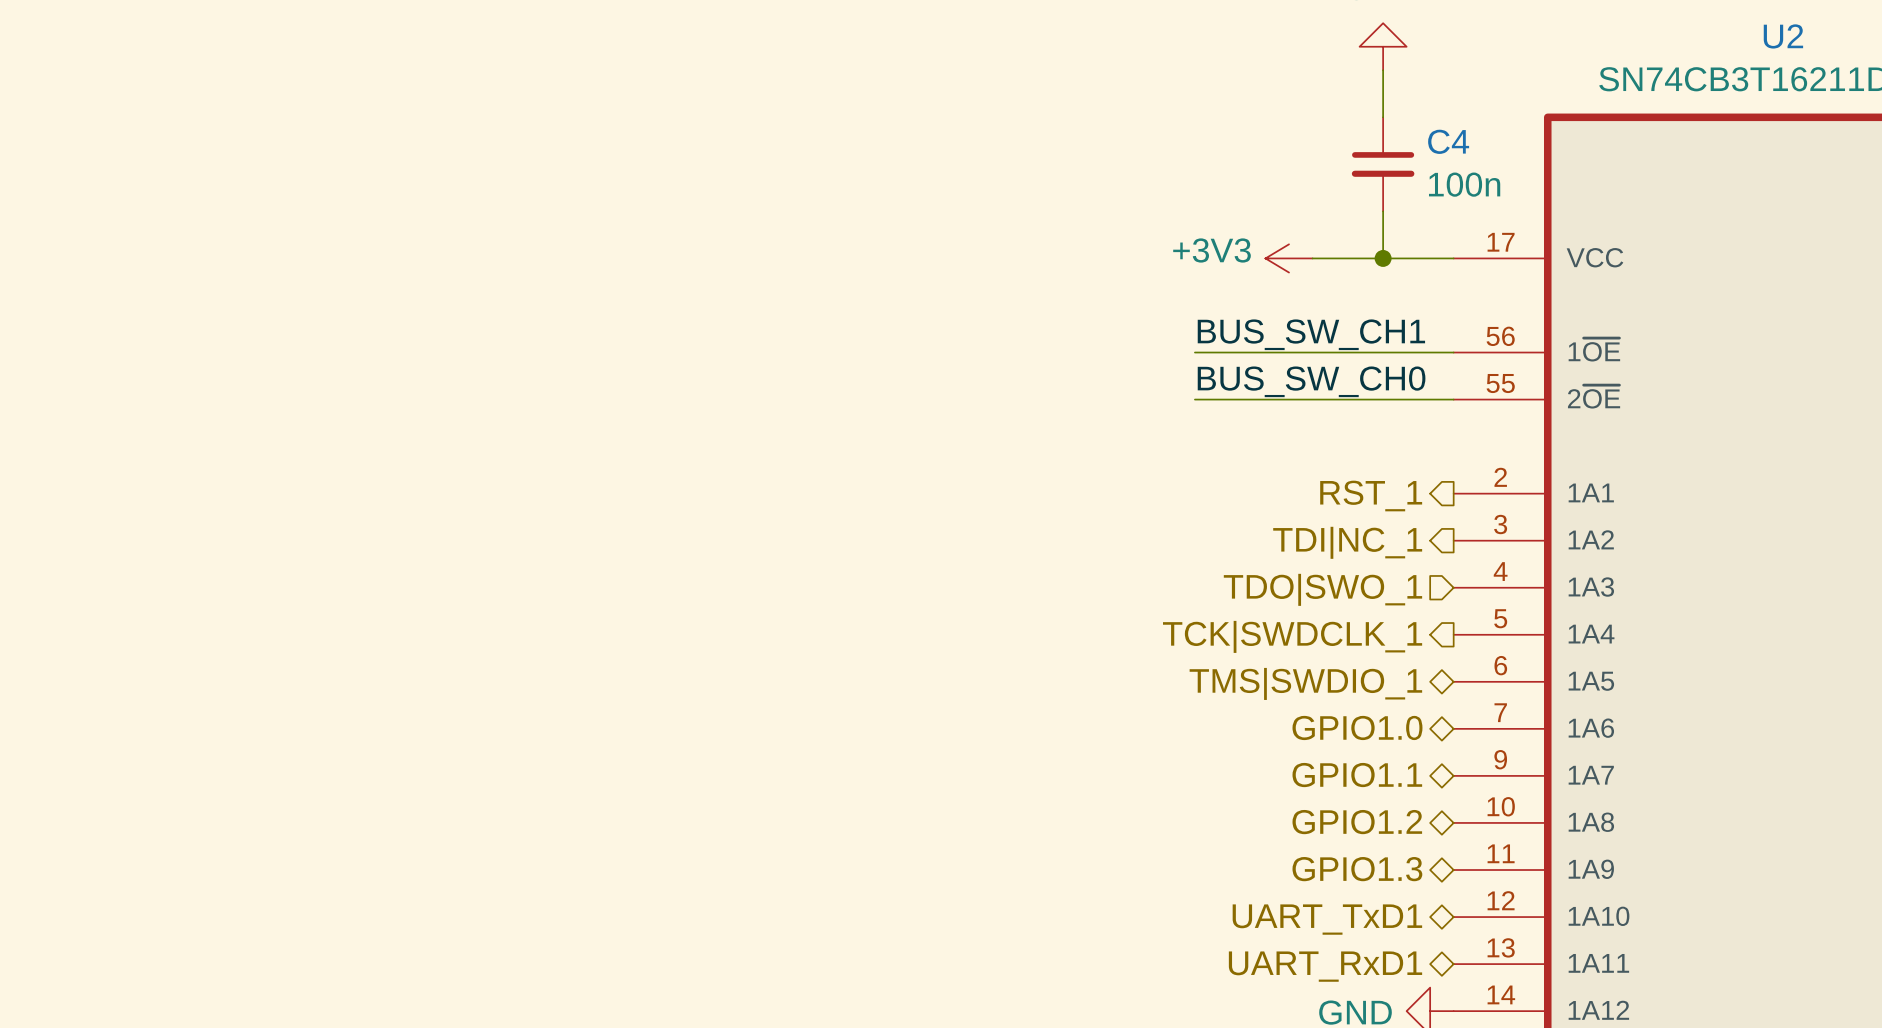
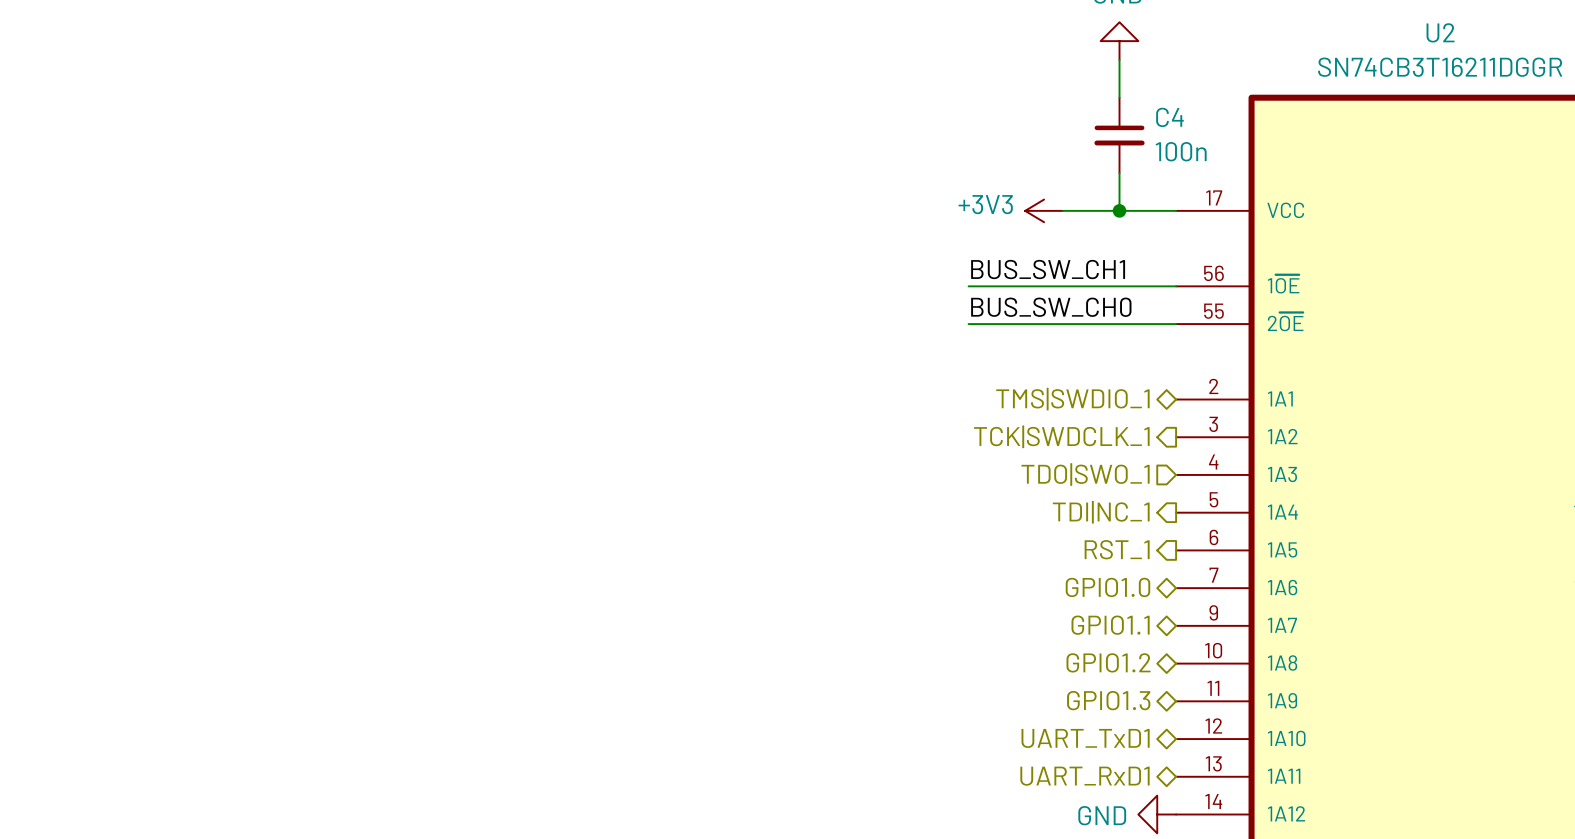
hierarchical label shape: output (1371, 495) -> bidirectional (1072, 399)
hierarchical label: RST_1 (1371, 495) -> TMS|SWDIO_1 (1072, 399)
hierarchical label: TDI|NC_1 (1347, 542) -> TCK|SWDCLK_1 (1061, 436)
hierarchical label: TCK|SWDCLK_1 (1292, 636) -> TDI|NC_1 (1101, 512)
hierarchical label shape: bidirectional (1305, 683) -> output (1117, 549)
hierarchical label: TMS|SWDIO_1 (1305, 683) -> RST_1 (1117, 549)

